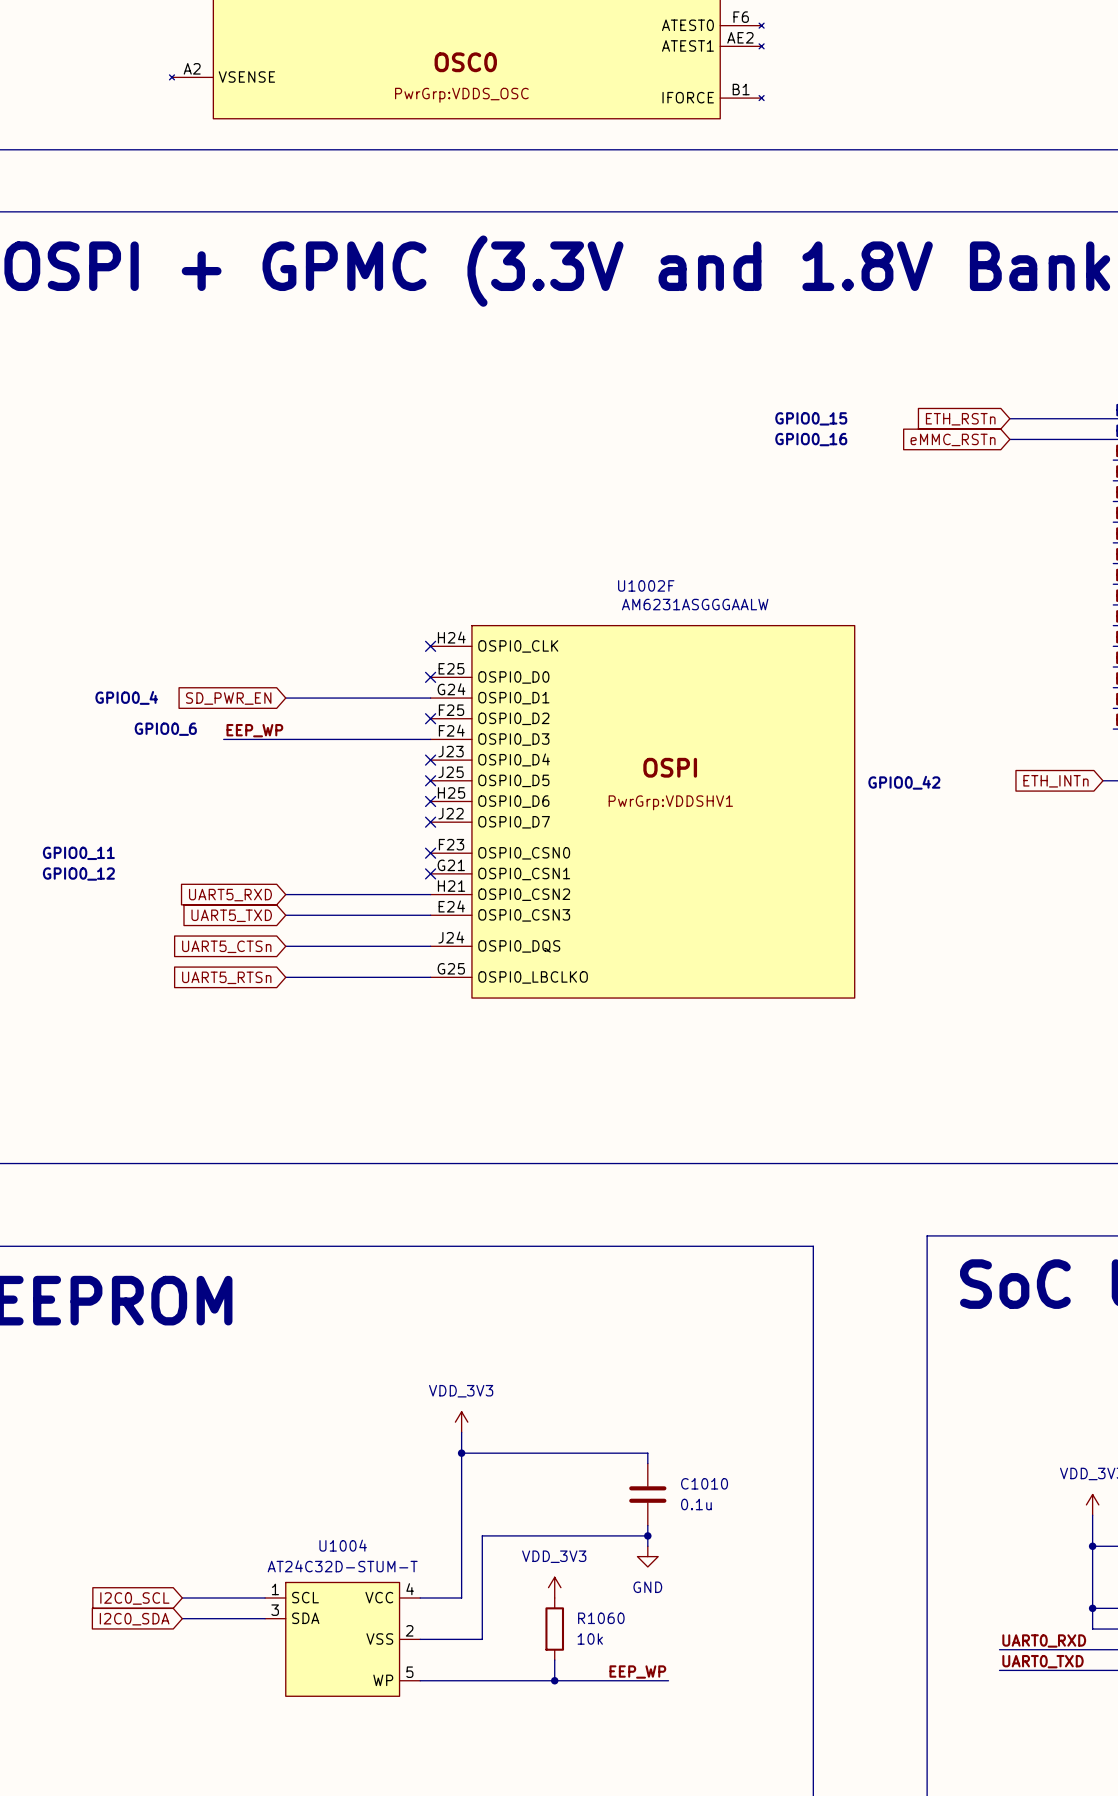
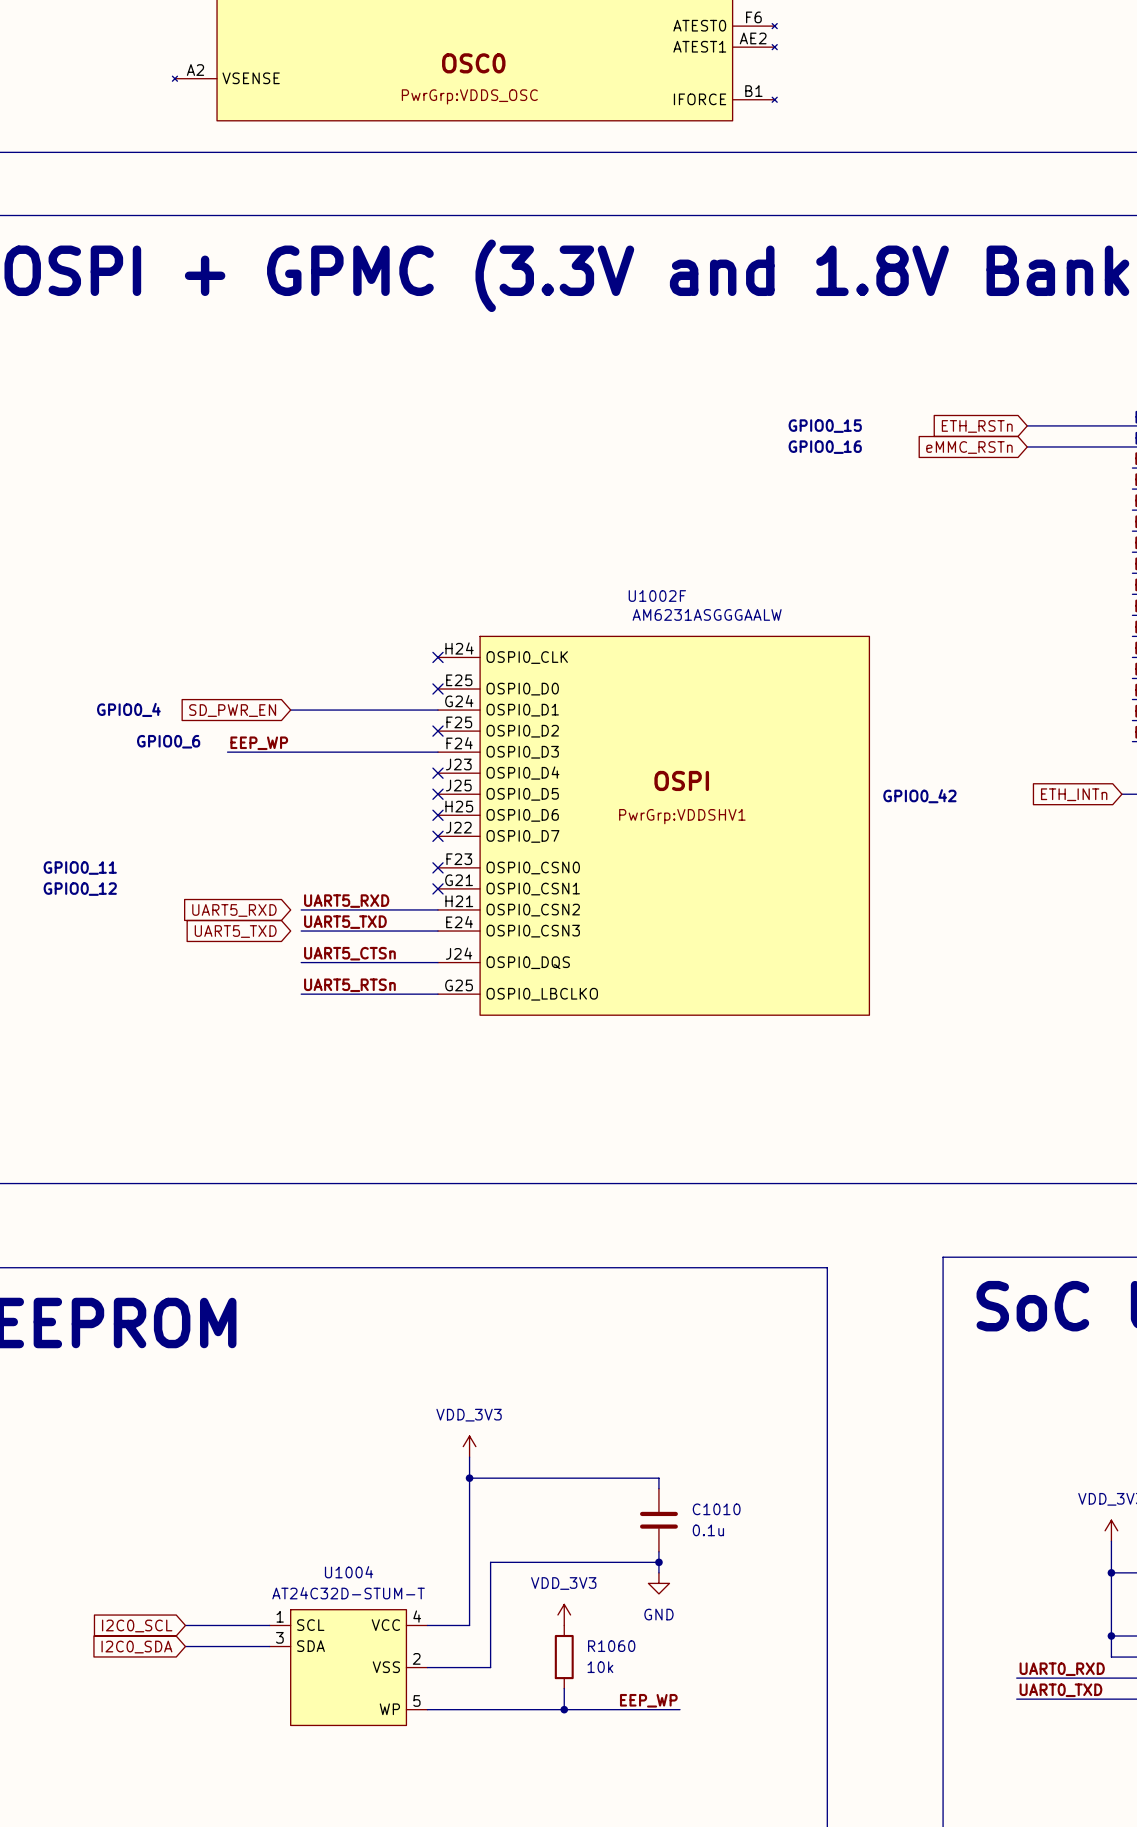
label: none -> UART5_RXD (346, 901)
wire: (285, 894) (296, 894) -> none
label: none -> UART5_TXD (345, 922)
wire: (285, 915) (296, 915) -> none
label: none -> UART5_CTSn (349, 953)
global label: UART5_CTSn (226, 946) -> none
wire: (285, 946) (296, 946) -> none
label: none -> UART5_RTSn (349, 985)
global label: UART5_RTSn (226, 977) -> none
wire: (285, 977) (296, 977) -> none

